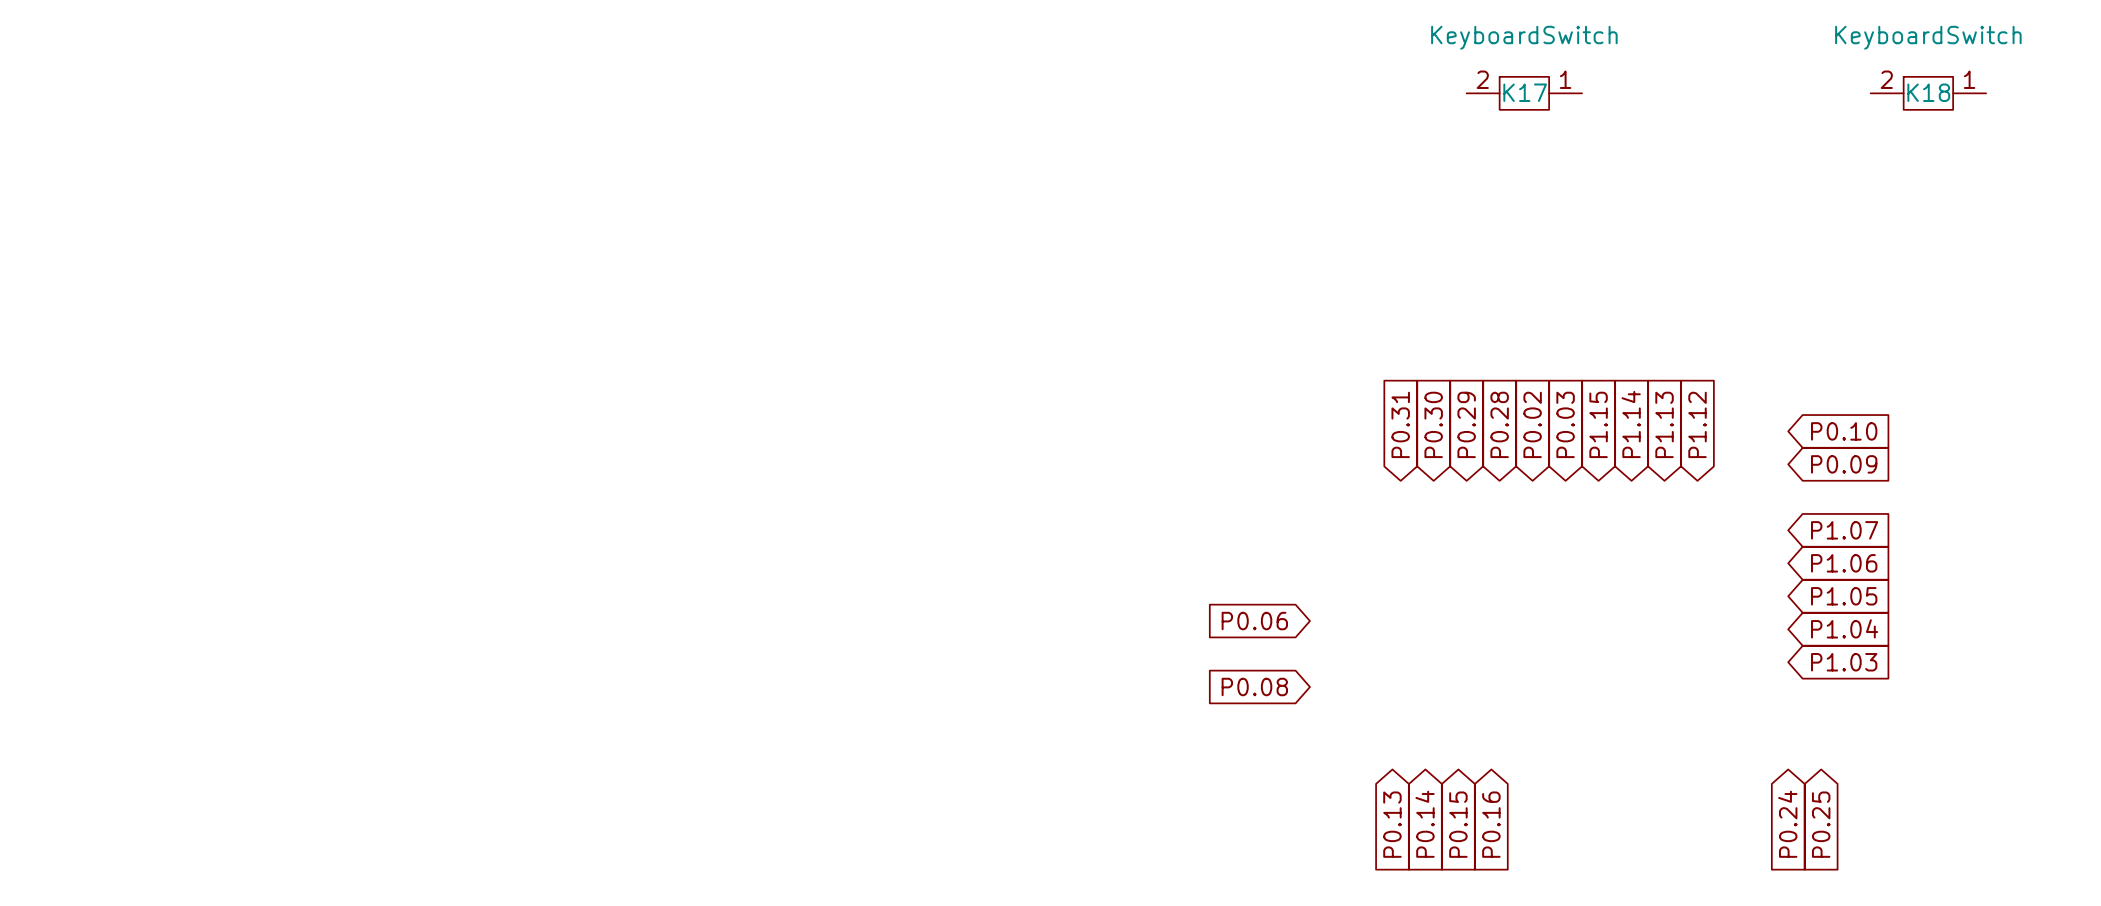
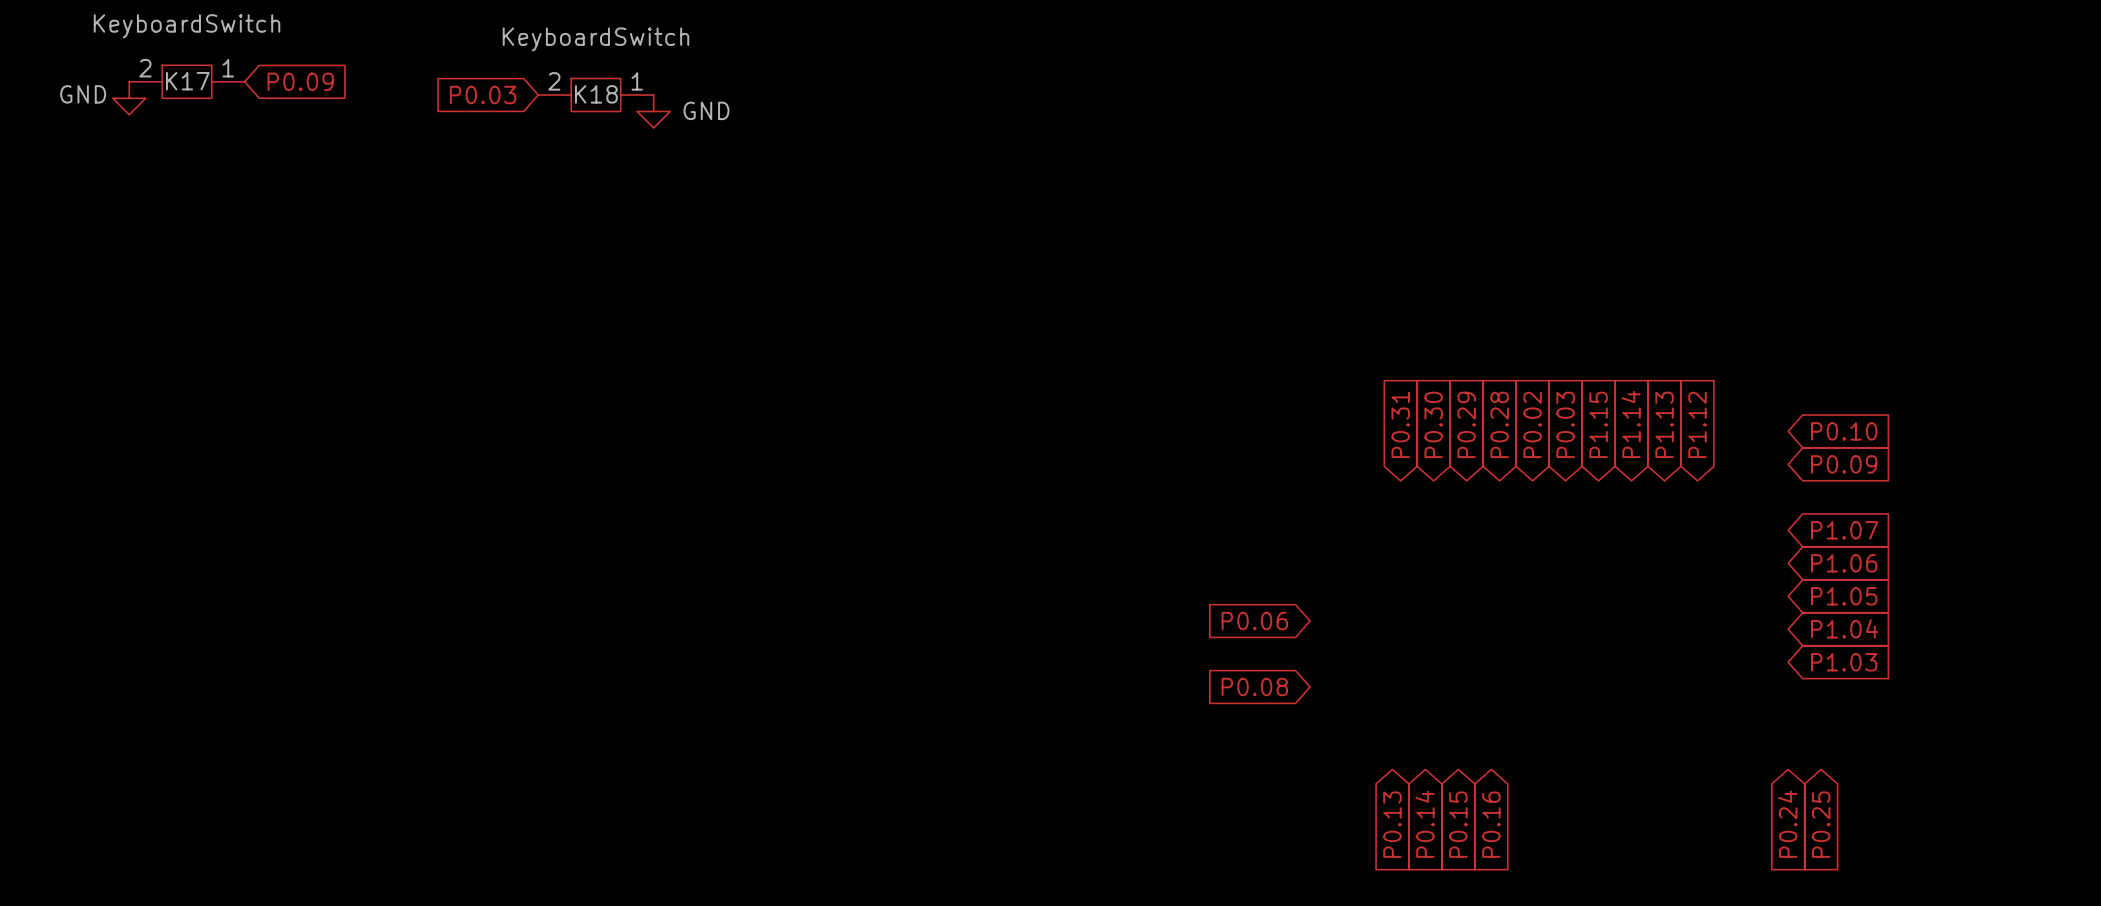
global label: none -> P0.09 (300, 81)
K17 position: (1524, 93) -> (187, 81)
K18 position: (1928, 93) -> (595, 95)
global label: none -> P0.03 (483, 95)
power symbol: none -> GND (129, 98)
power symbol: none -> GND (653, 111)

